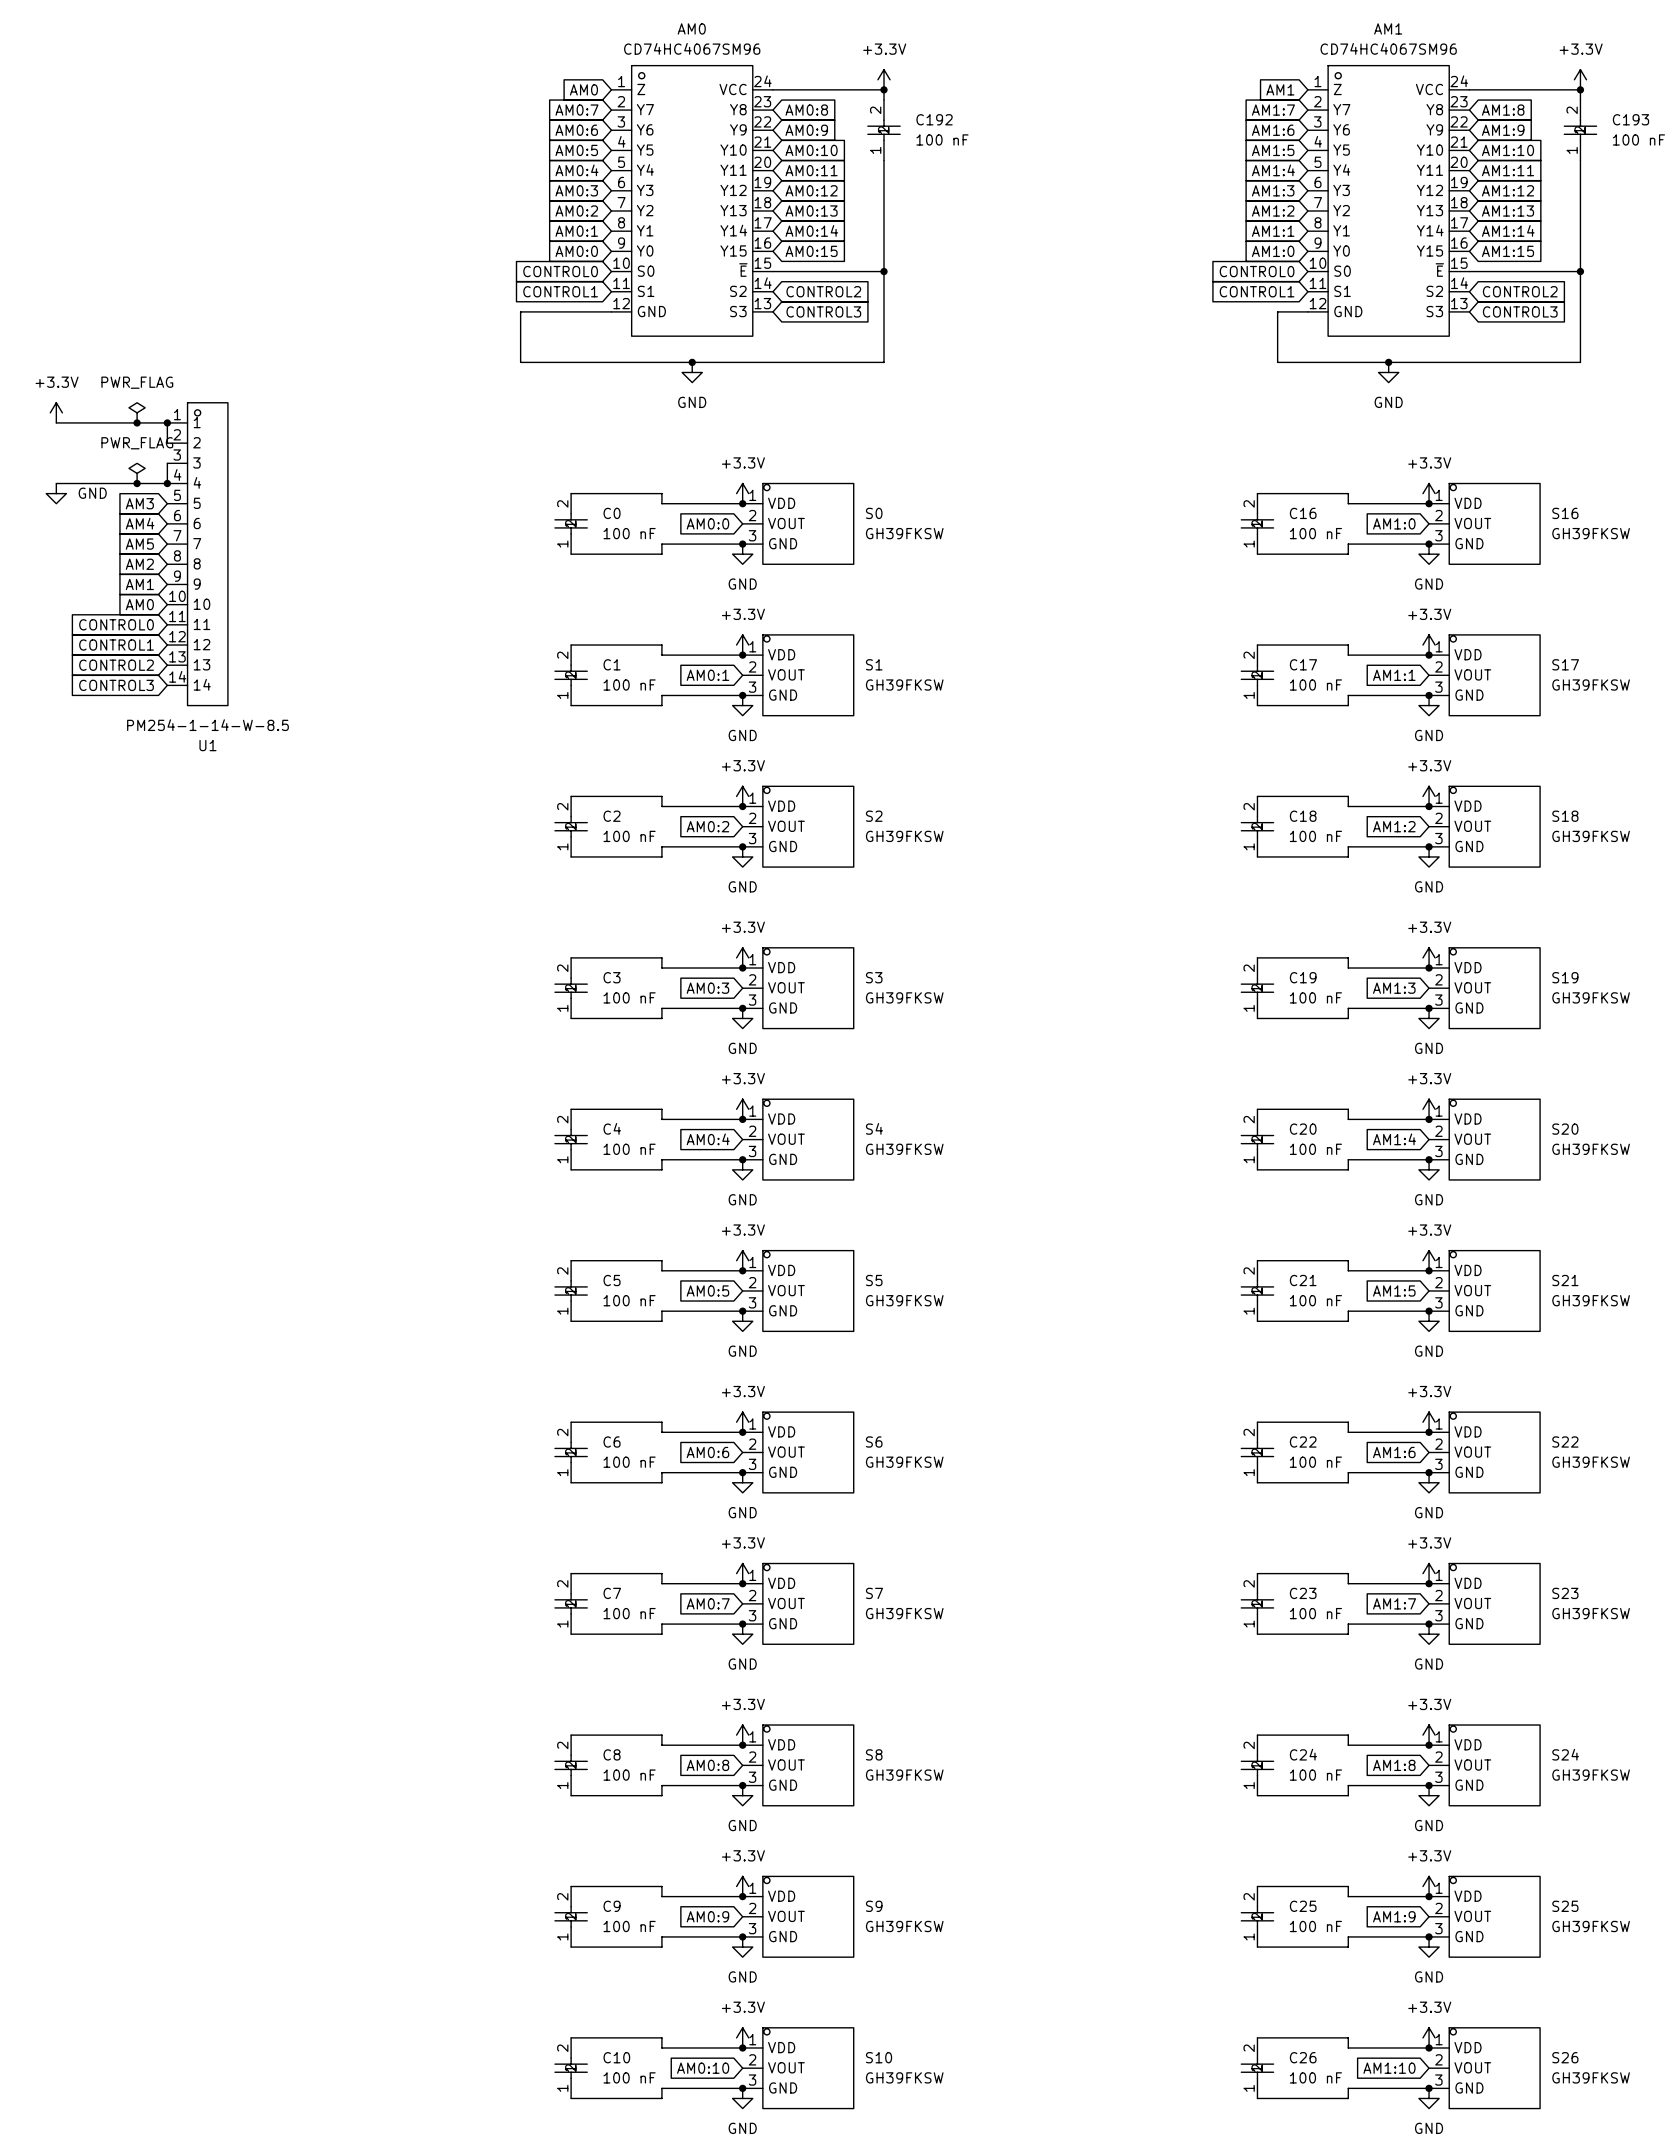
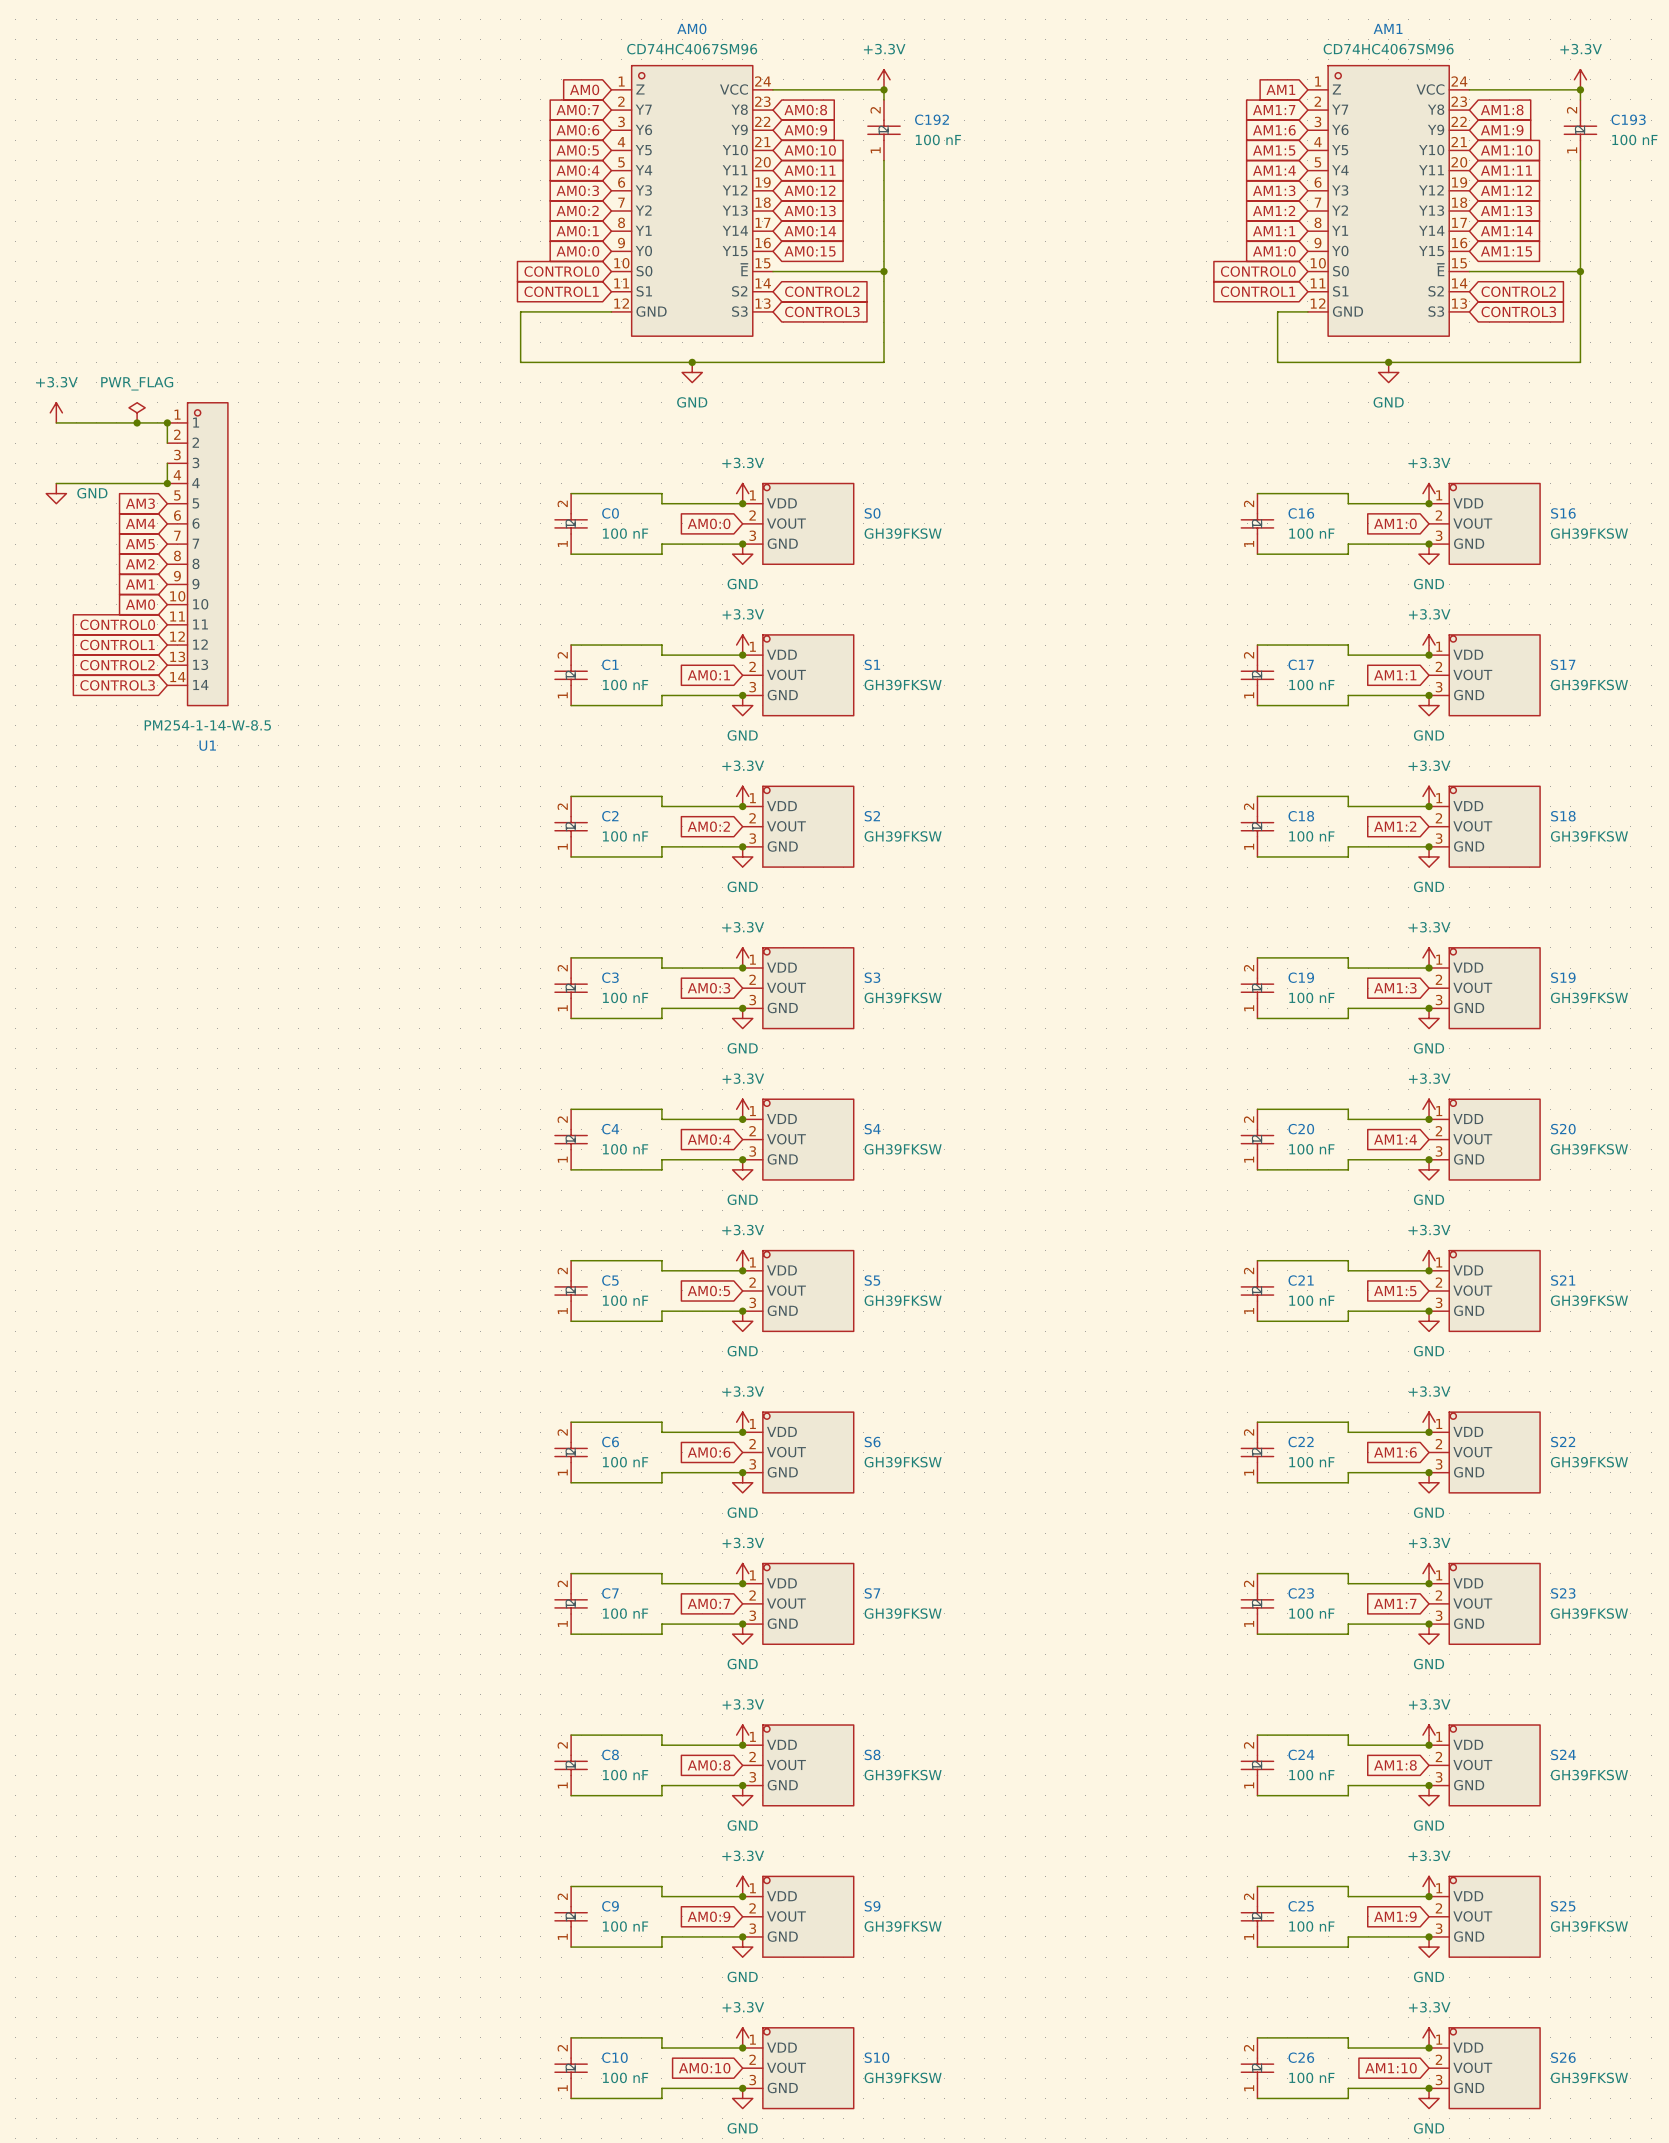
power symbol: PWR_FLAG (137, 473) -> none
junction: (137, 483) -> none

